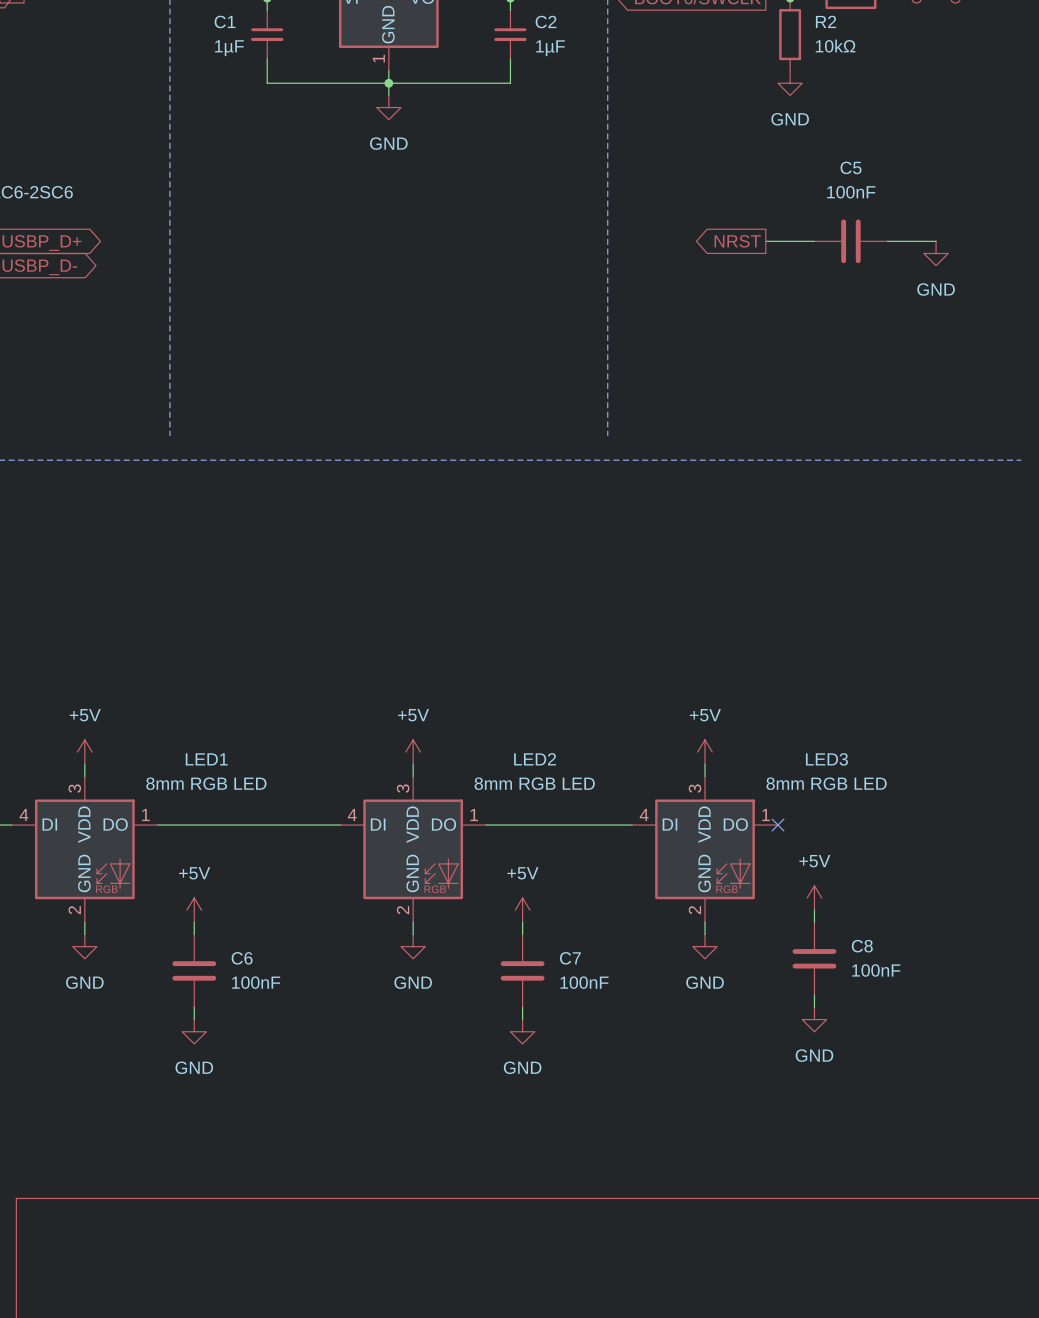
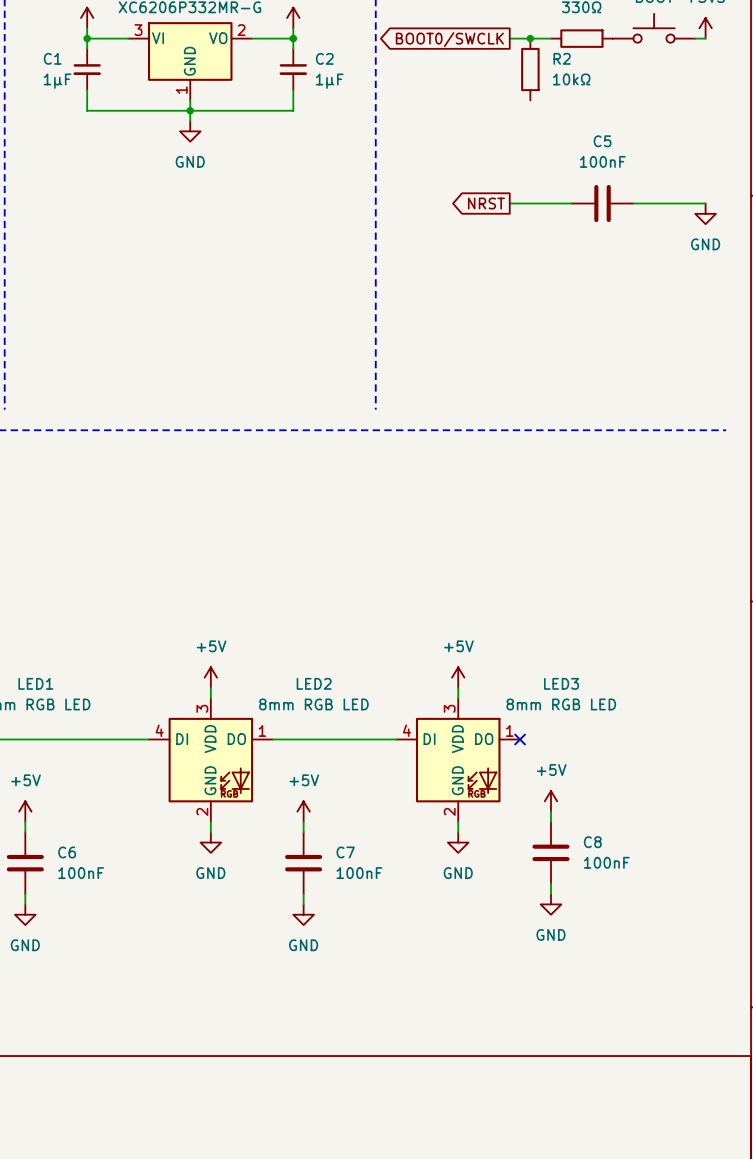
power symbol: GND (790, 83) -> none
wire: none -> (509, 203) (571, 203)
wire: none -> (633, 203) (705, 203)
global label position: NRST (737, 241) -> NRST (486, 203)
wire: (765, 241) (814, 241) -> none
C5 position: (850, 241) -> (602, 203)
wire: (887, 241) (936, 241) -> none
power symbol position: GND (936, 253) -> GND (705, 213)

